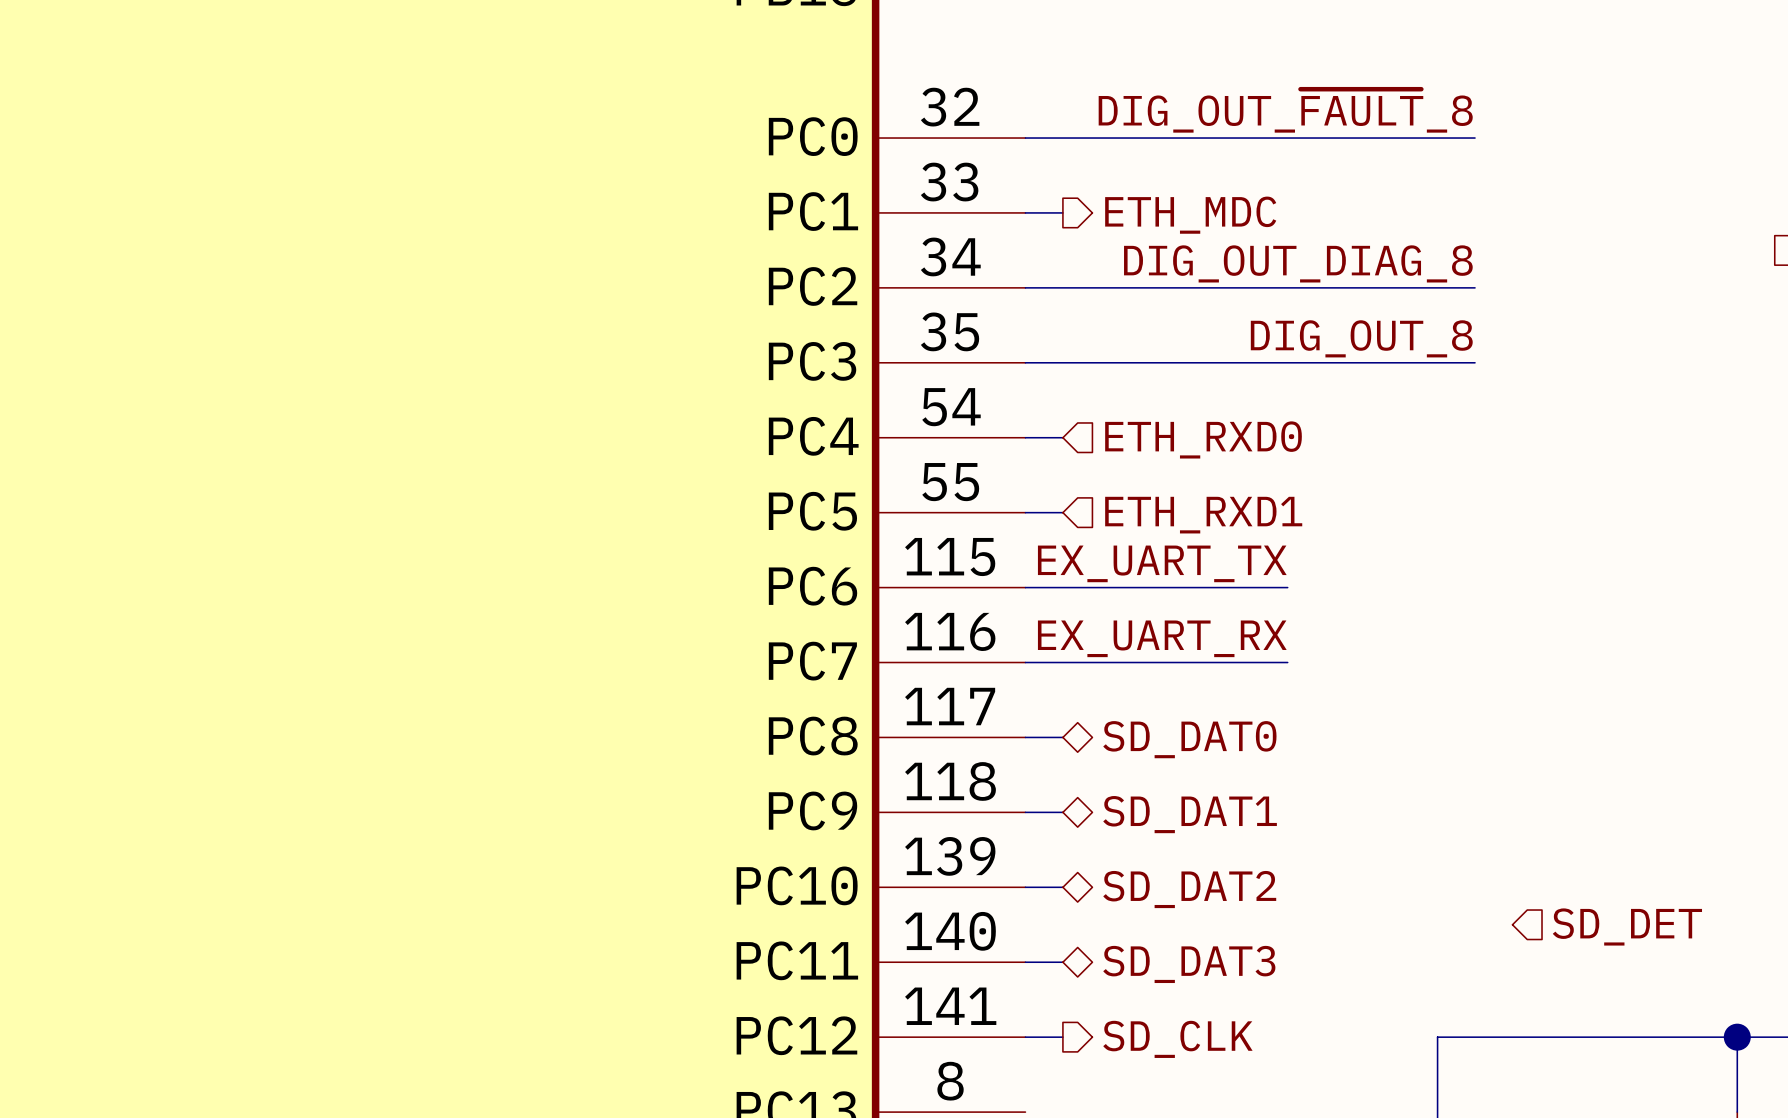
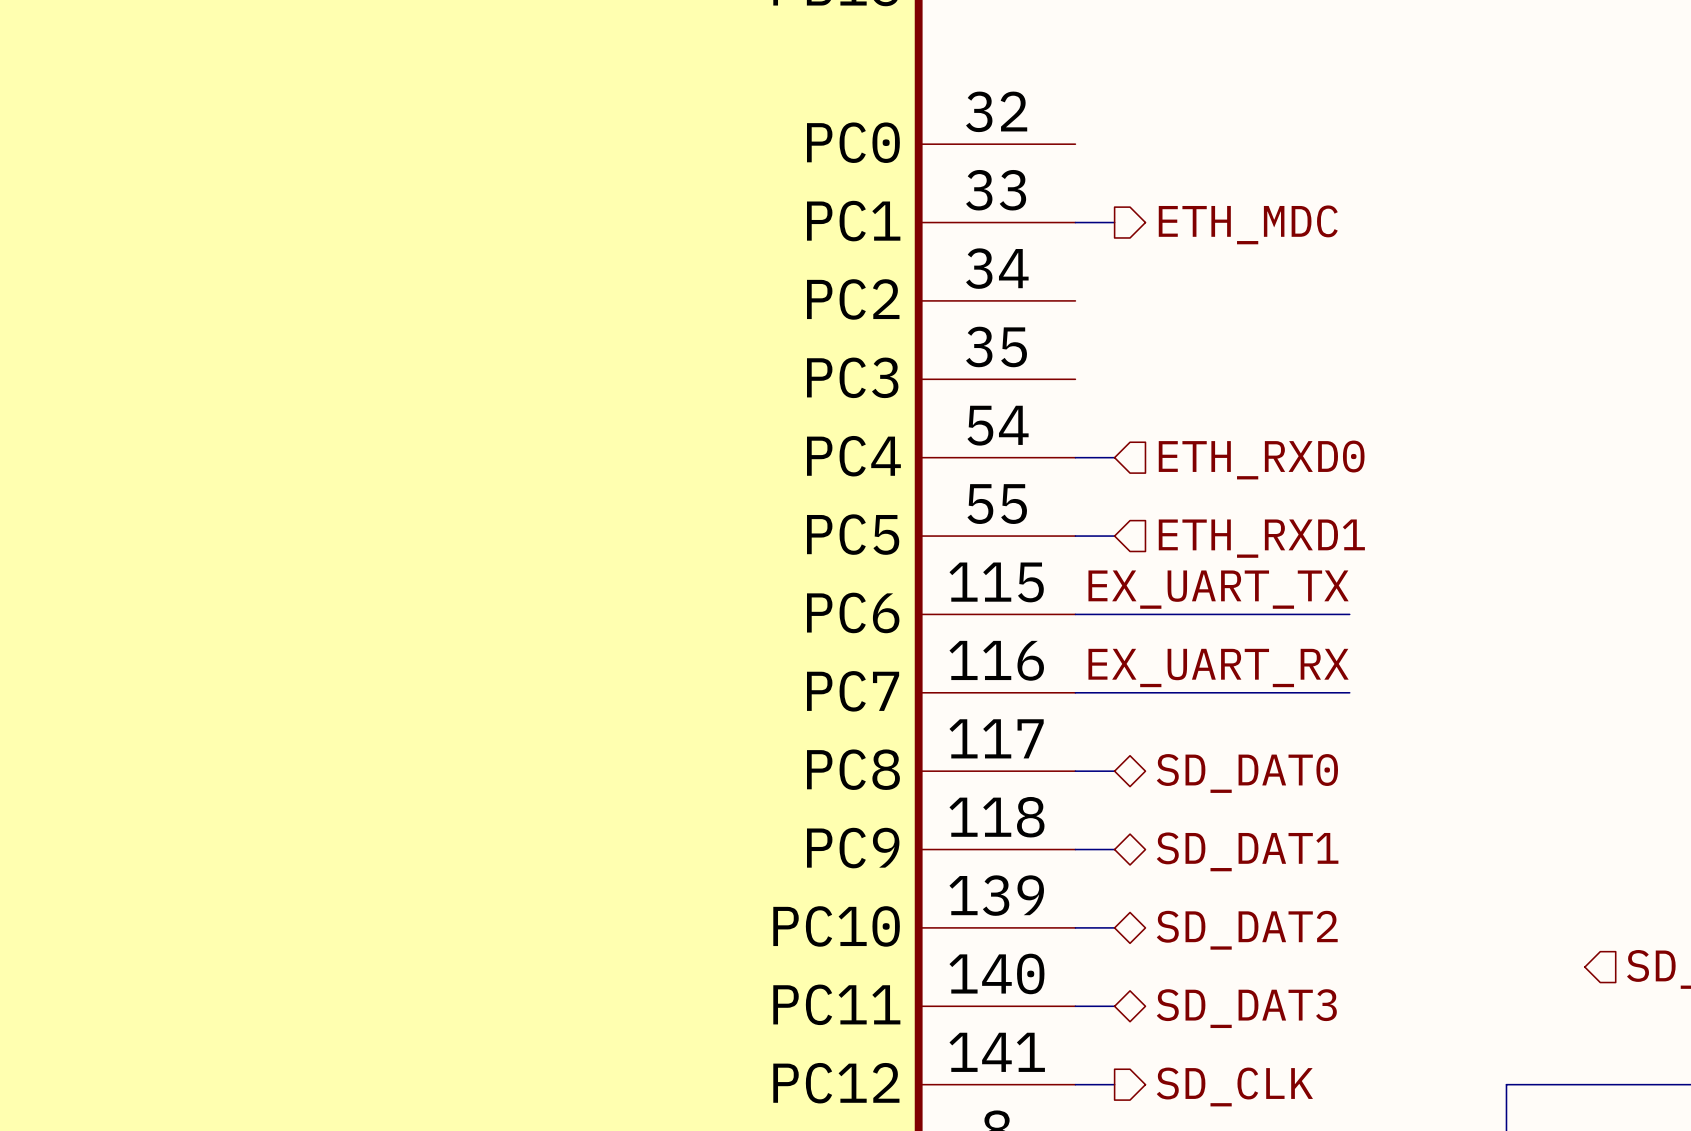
label: DIG_OUT_~{FAULT}_8 (1285, 110) -> none
wire: (1025, 138) (1475, 138) -> none
label: DIG_OUT_DIAG_8 (1298, 263) -> none
wire: (1025, 287) (1475, 287) -> none
label: DIG_OUT_8 (1361, 338) -> none
wire: (1025, 362) (1475, 362) -> none

